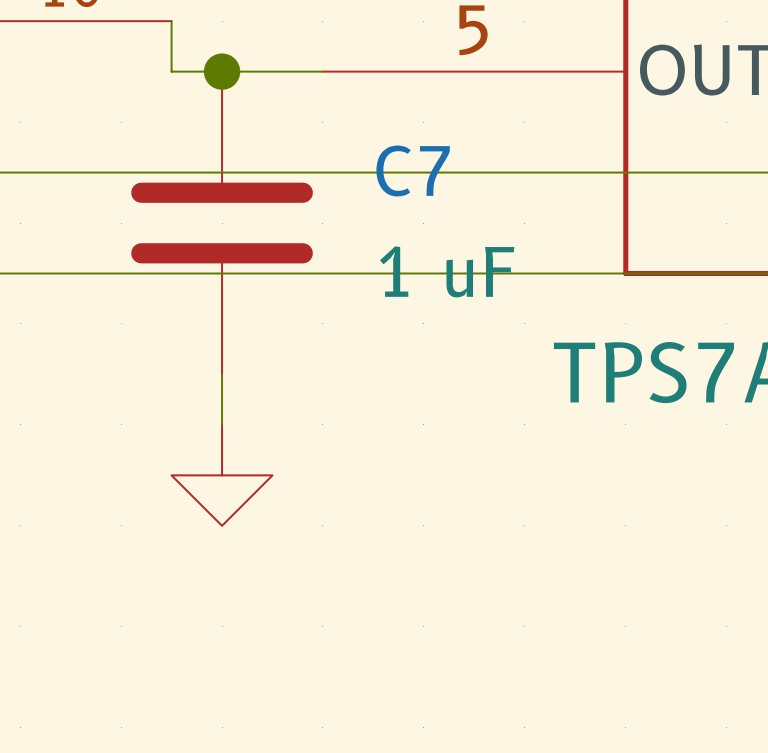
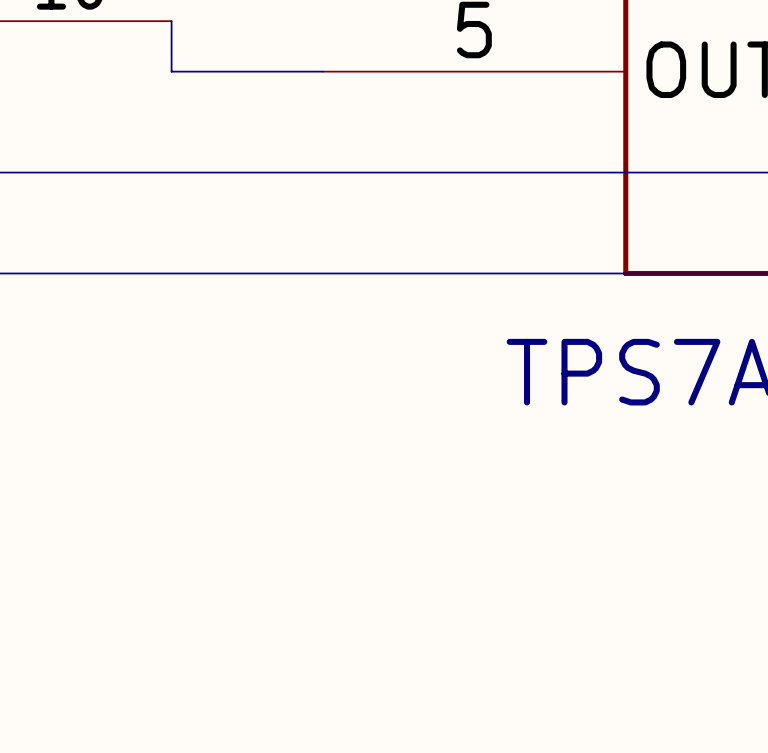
junction: (222, 71) -> none
C7: 1 uF (222, 223) -> none
wire: (222, 374) (222, 424) -> none
power symbol: (222, 475) -> none

